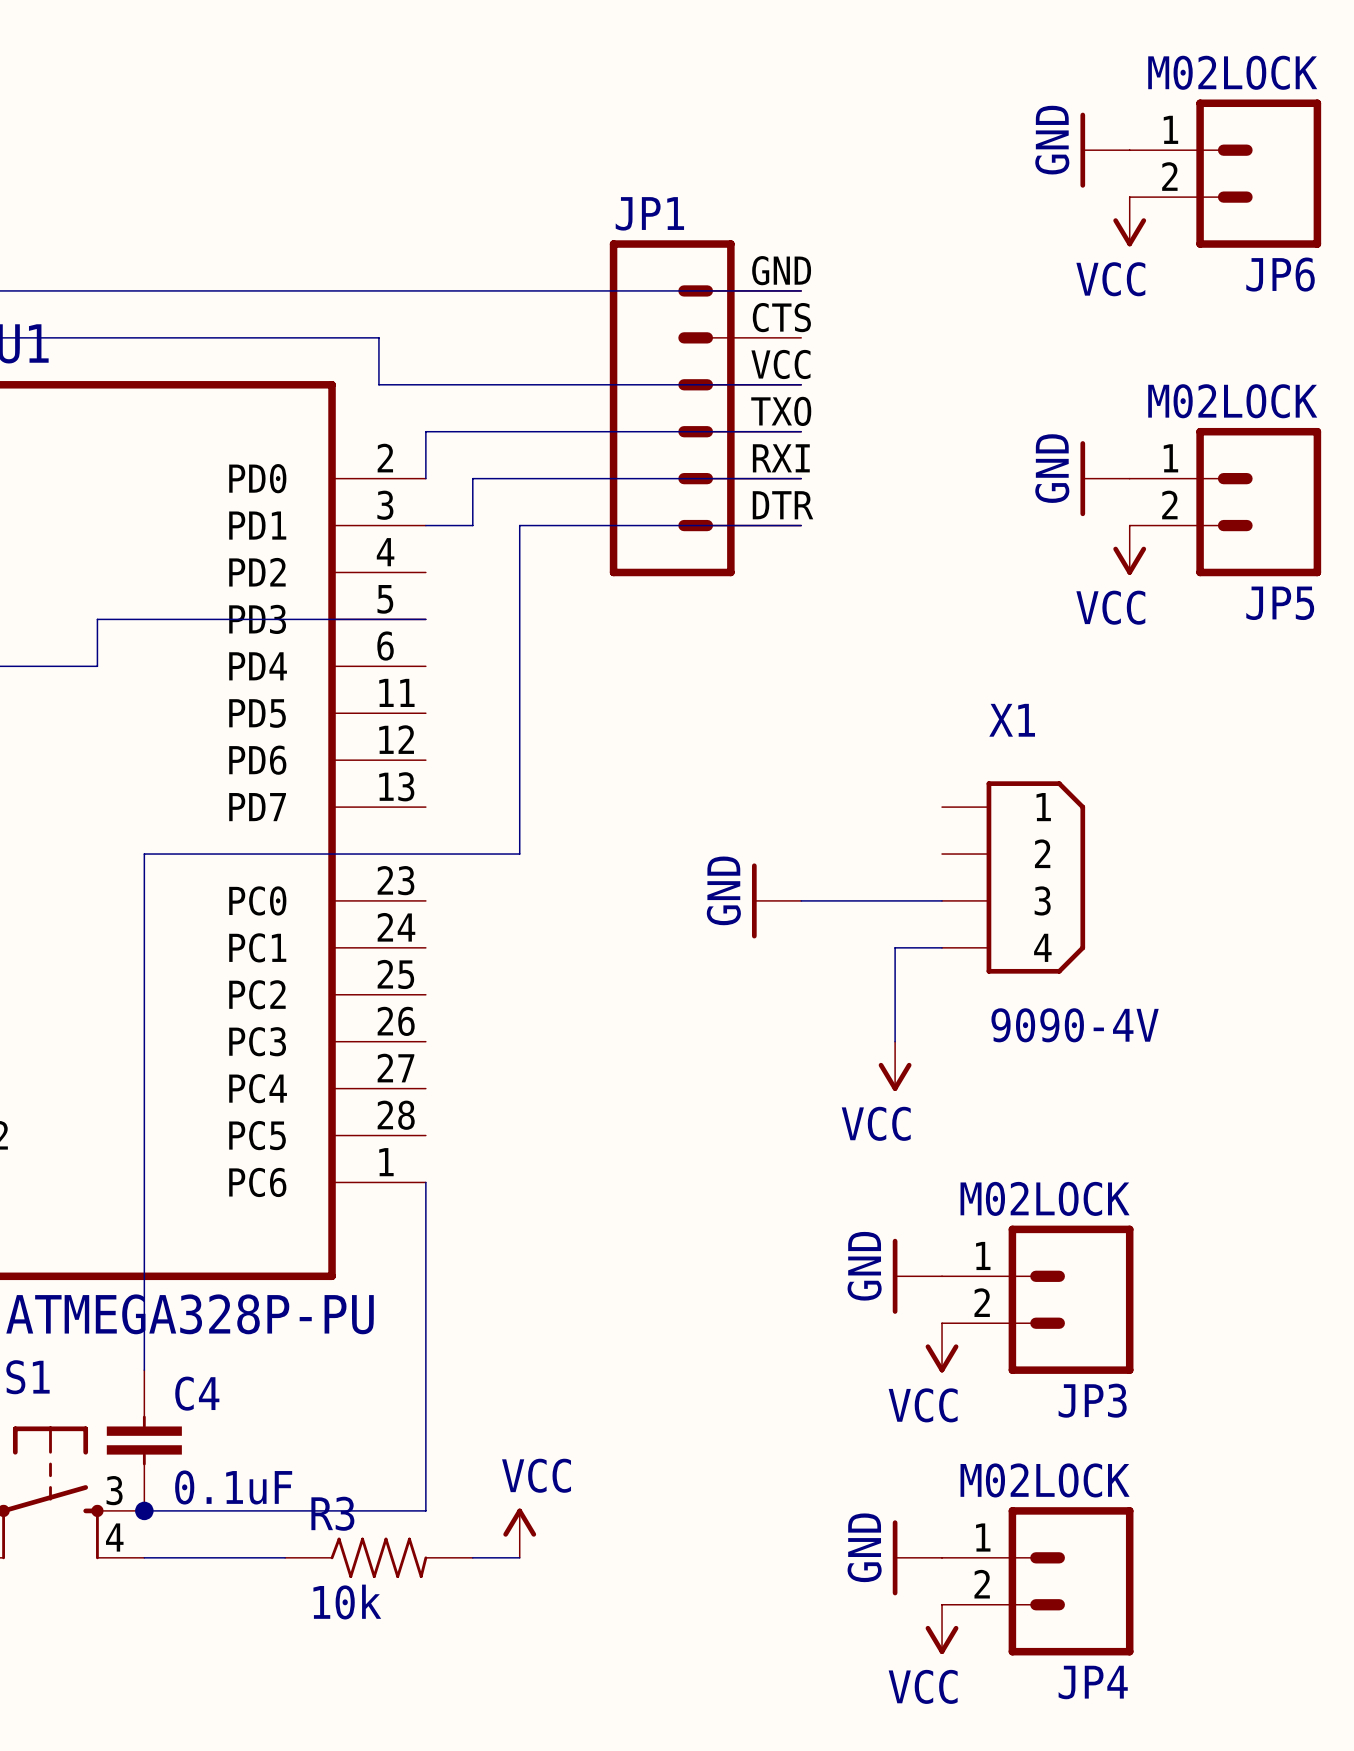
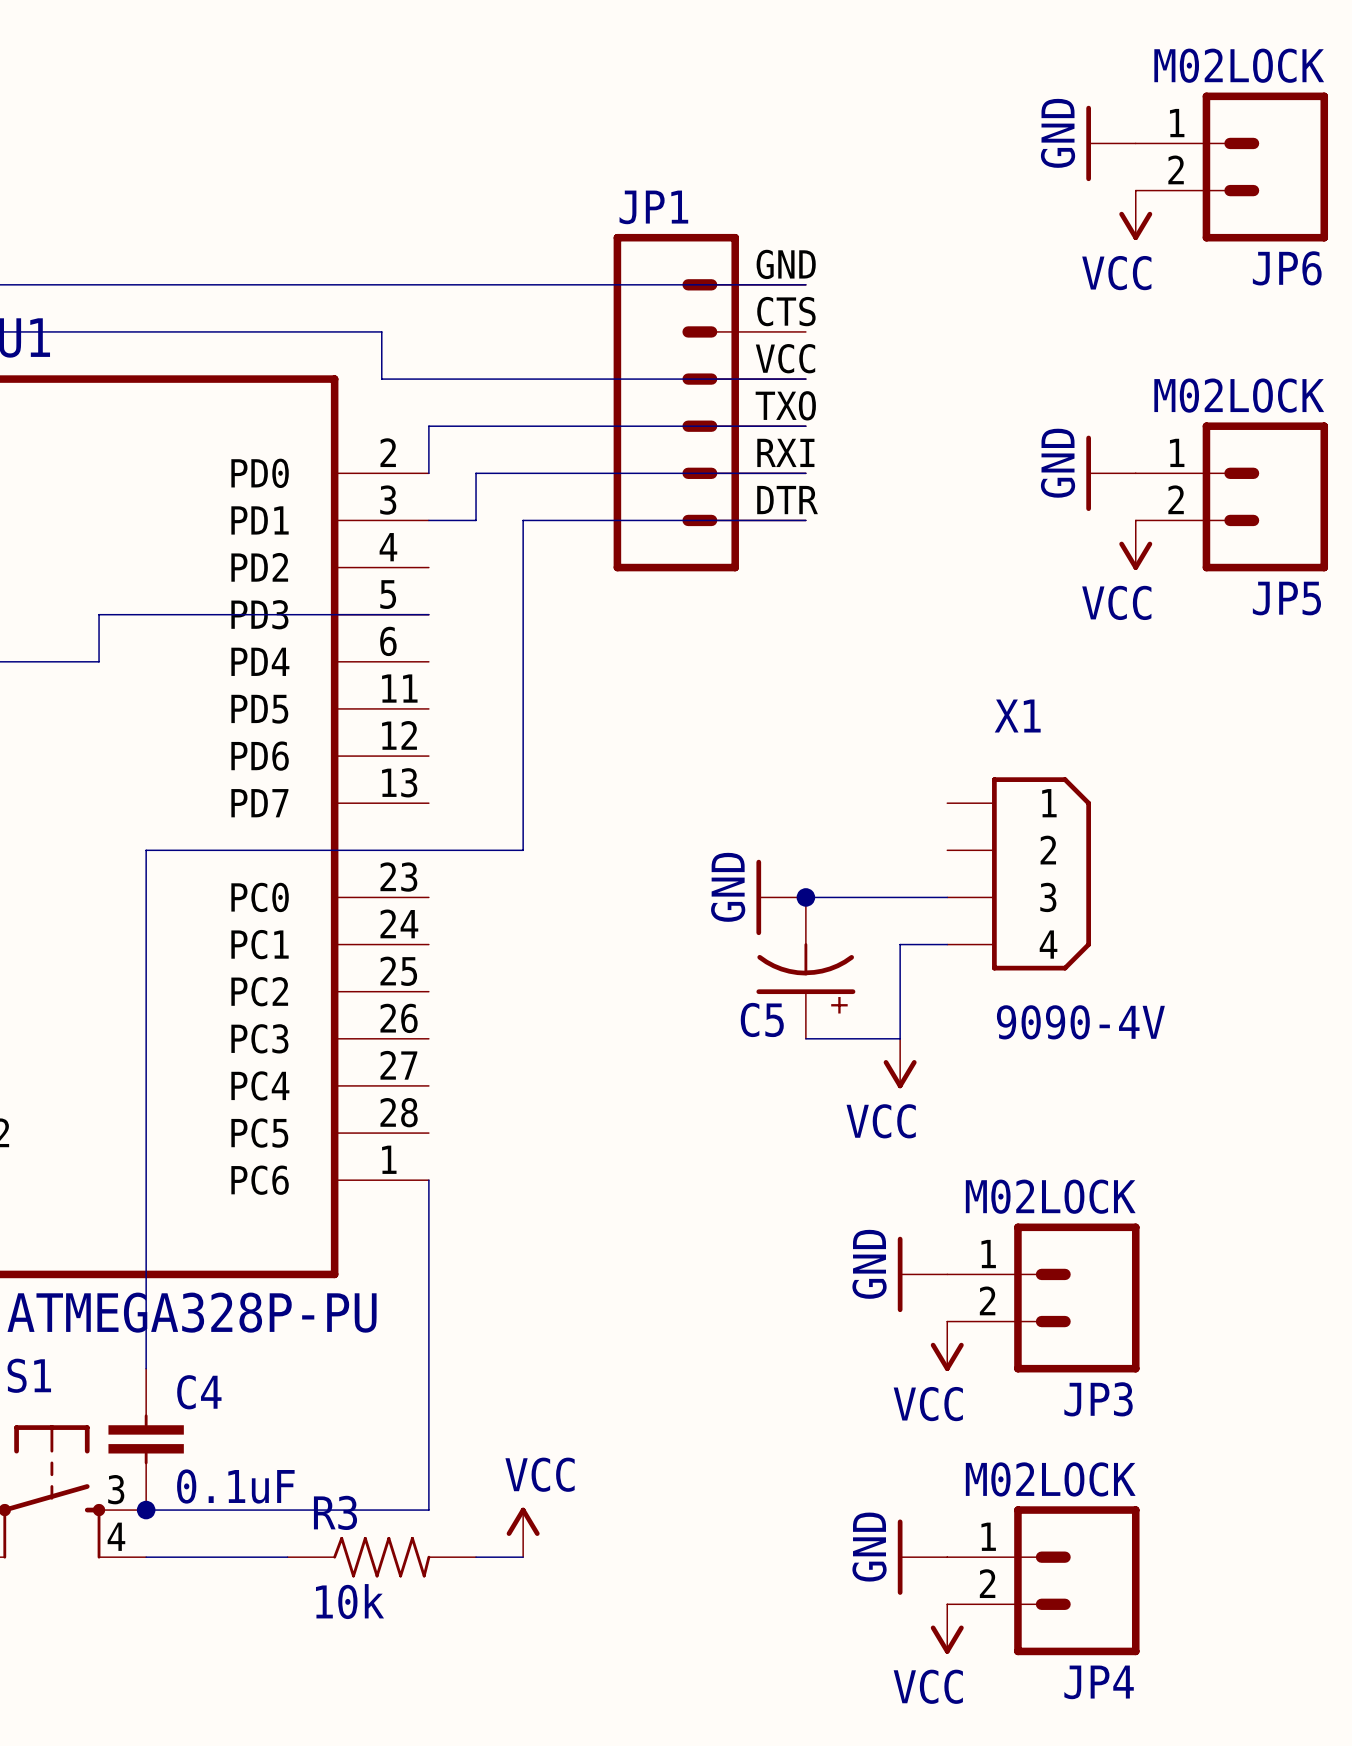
junction: none -> (805, 897)
C5: none -> (805, 968)
wire: none -> (805, 1038) (900, 1038)

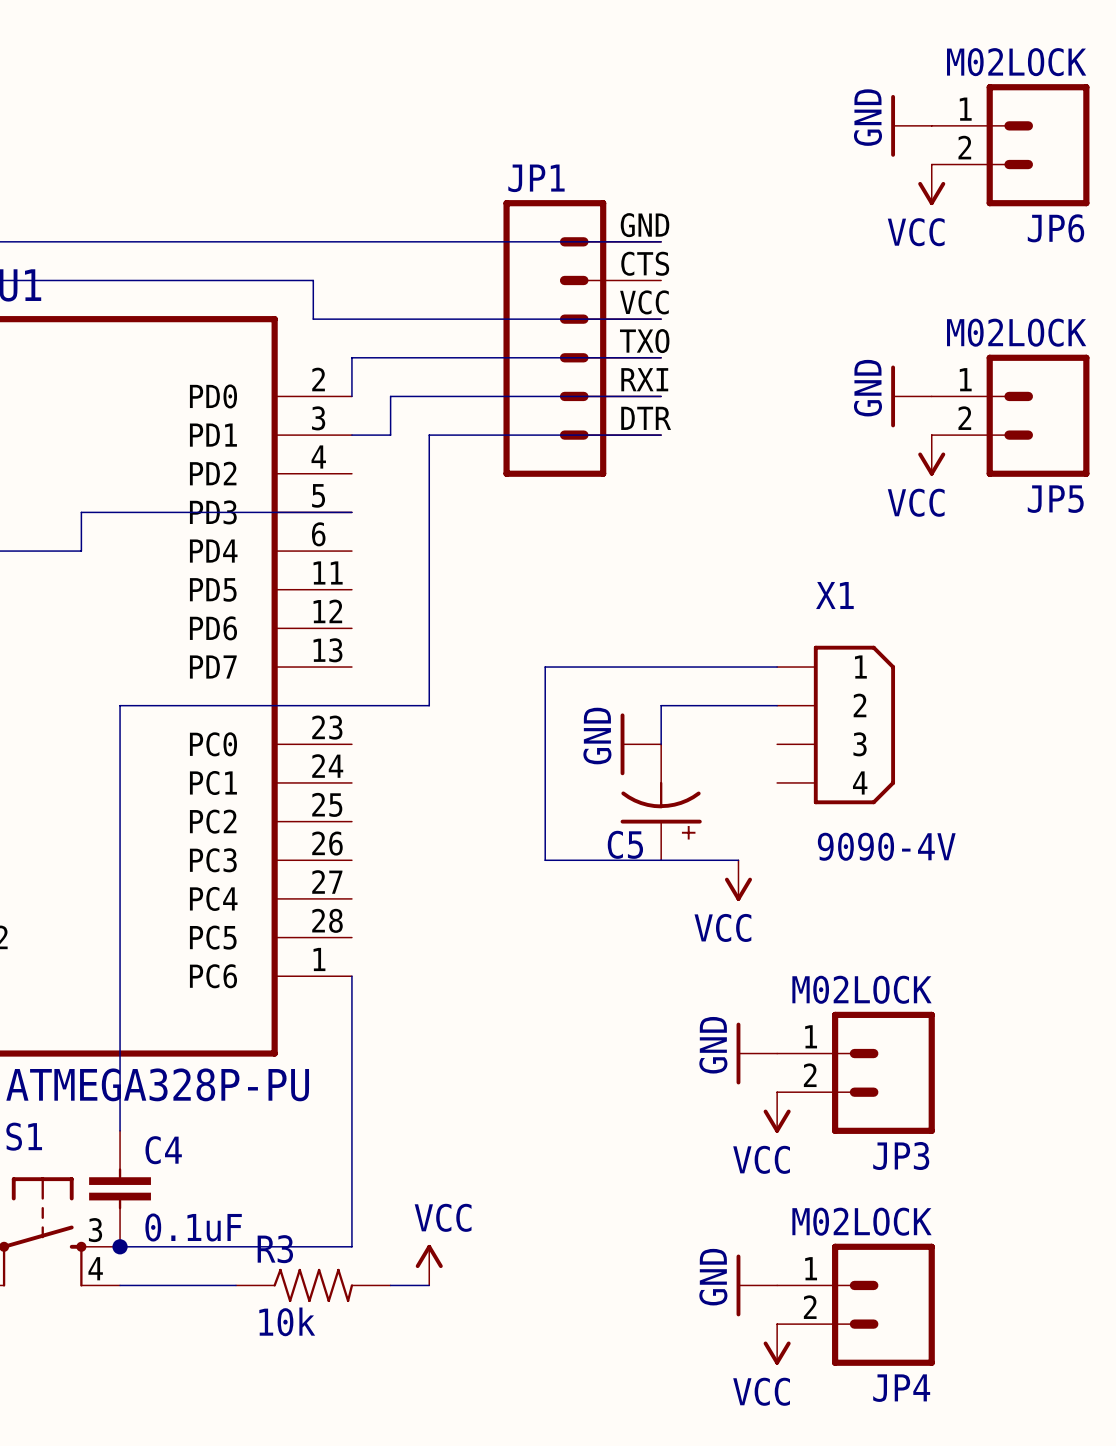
wire: none -> (777, 667) (545, 667) (545, 860) (661, 860)
wire: (805, 897) (947, 897) -> (661, 744) (661, 705) (777, 705)
junction: (805, 897) -> none
wire: (947, 944) (900, 944) (900, 1038) -> none

